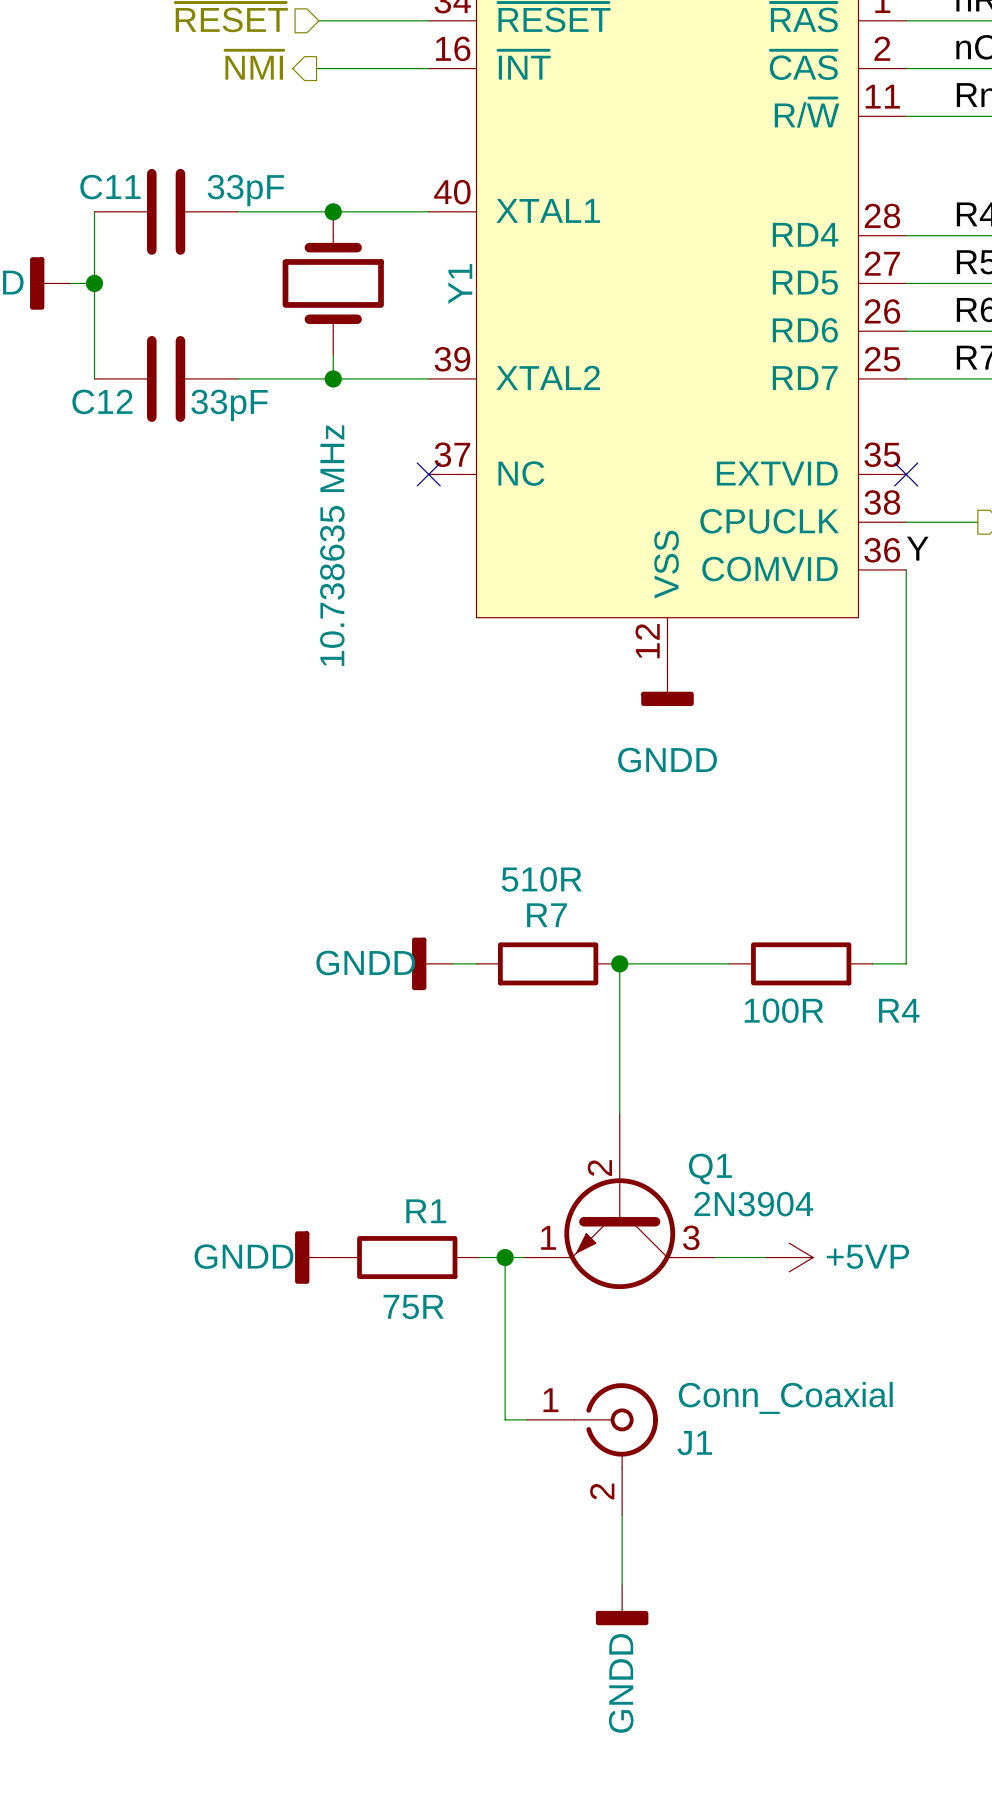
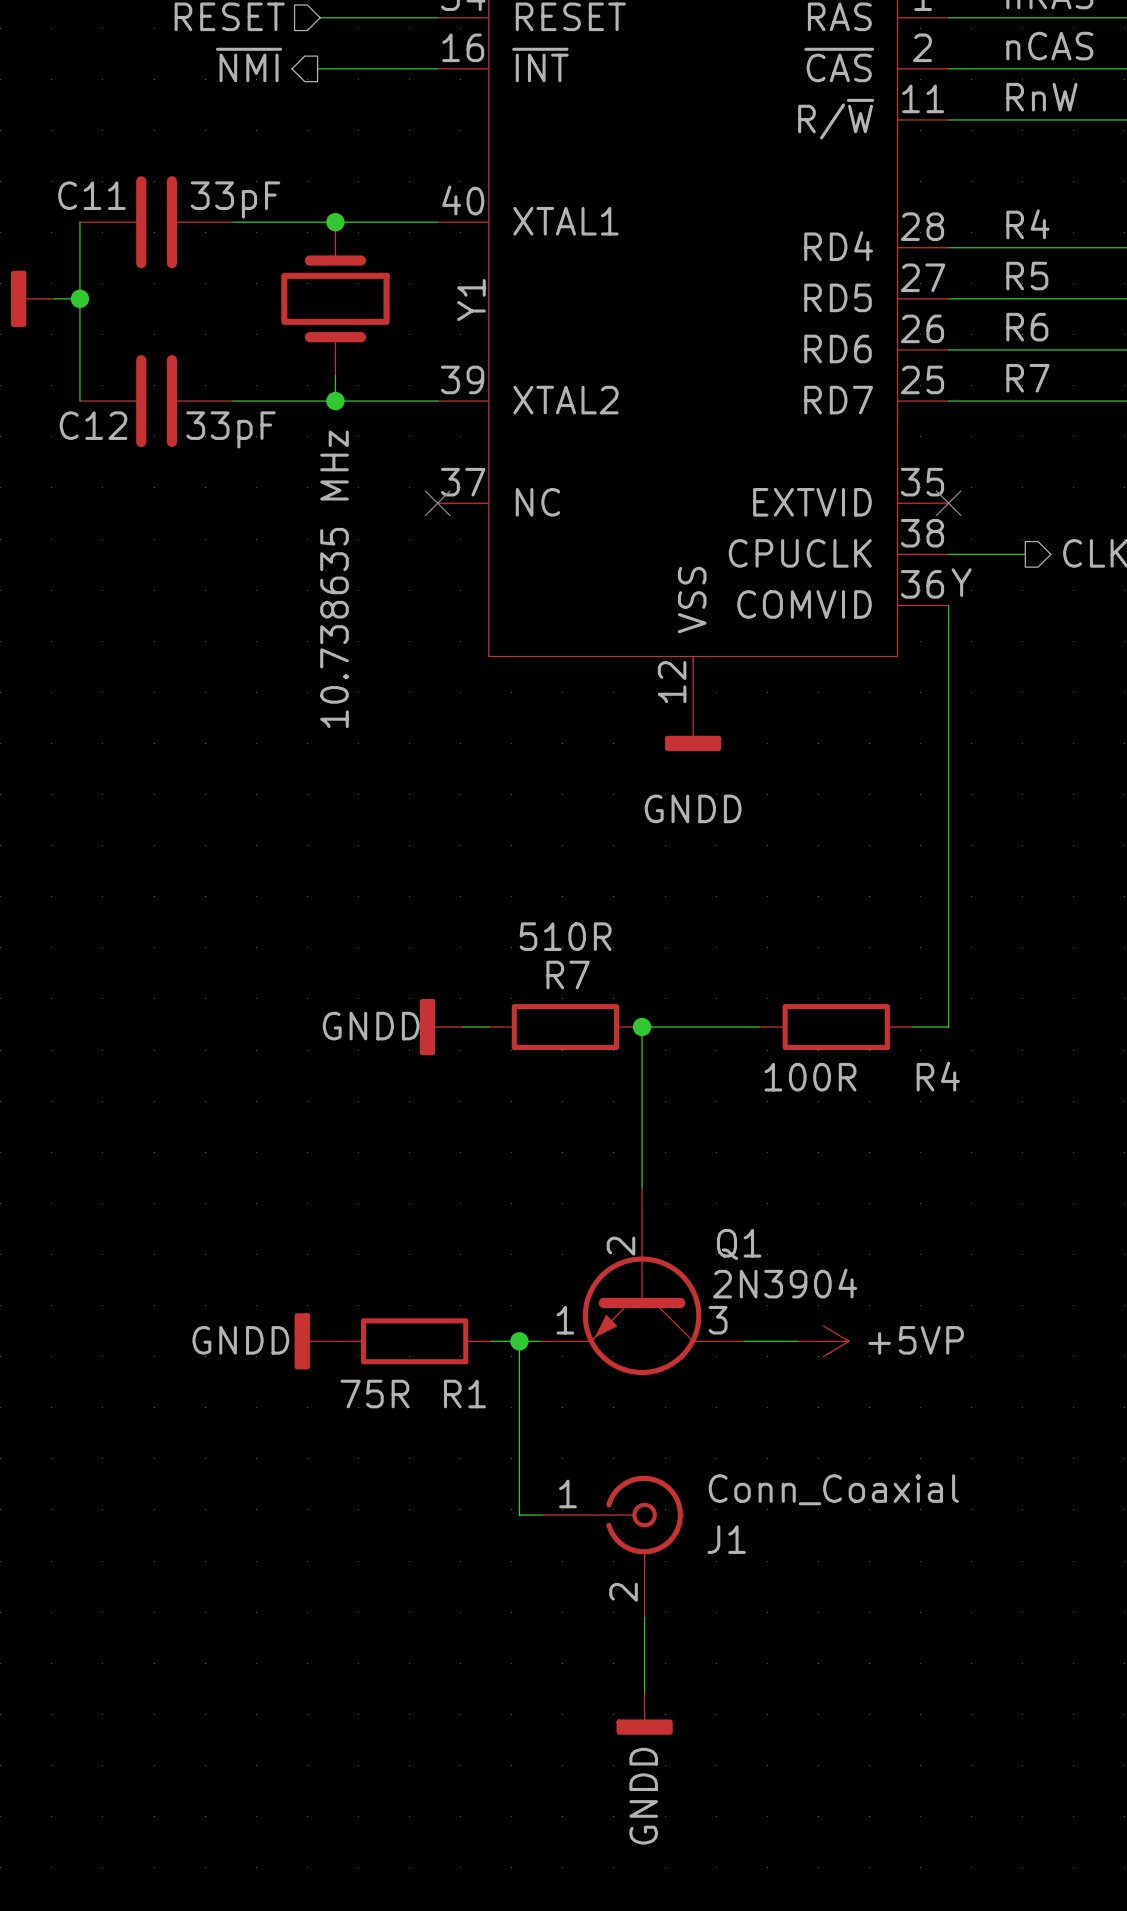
R1 name position: R1 (426, 1211) -> R1 (464, 1394)
R1 value position: 75R (413, 1306) -> 75R (374, 1394)

